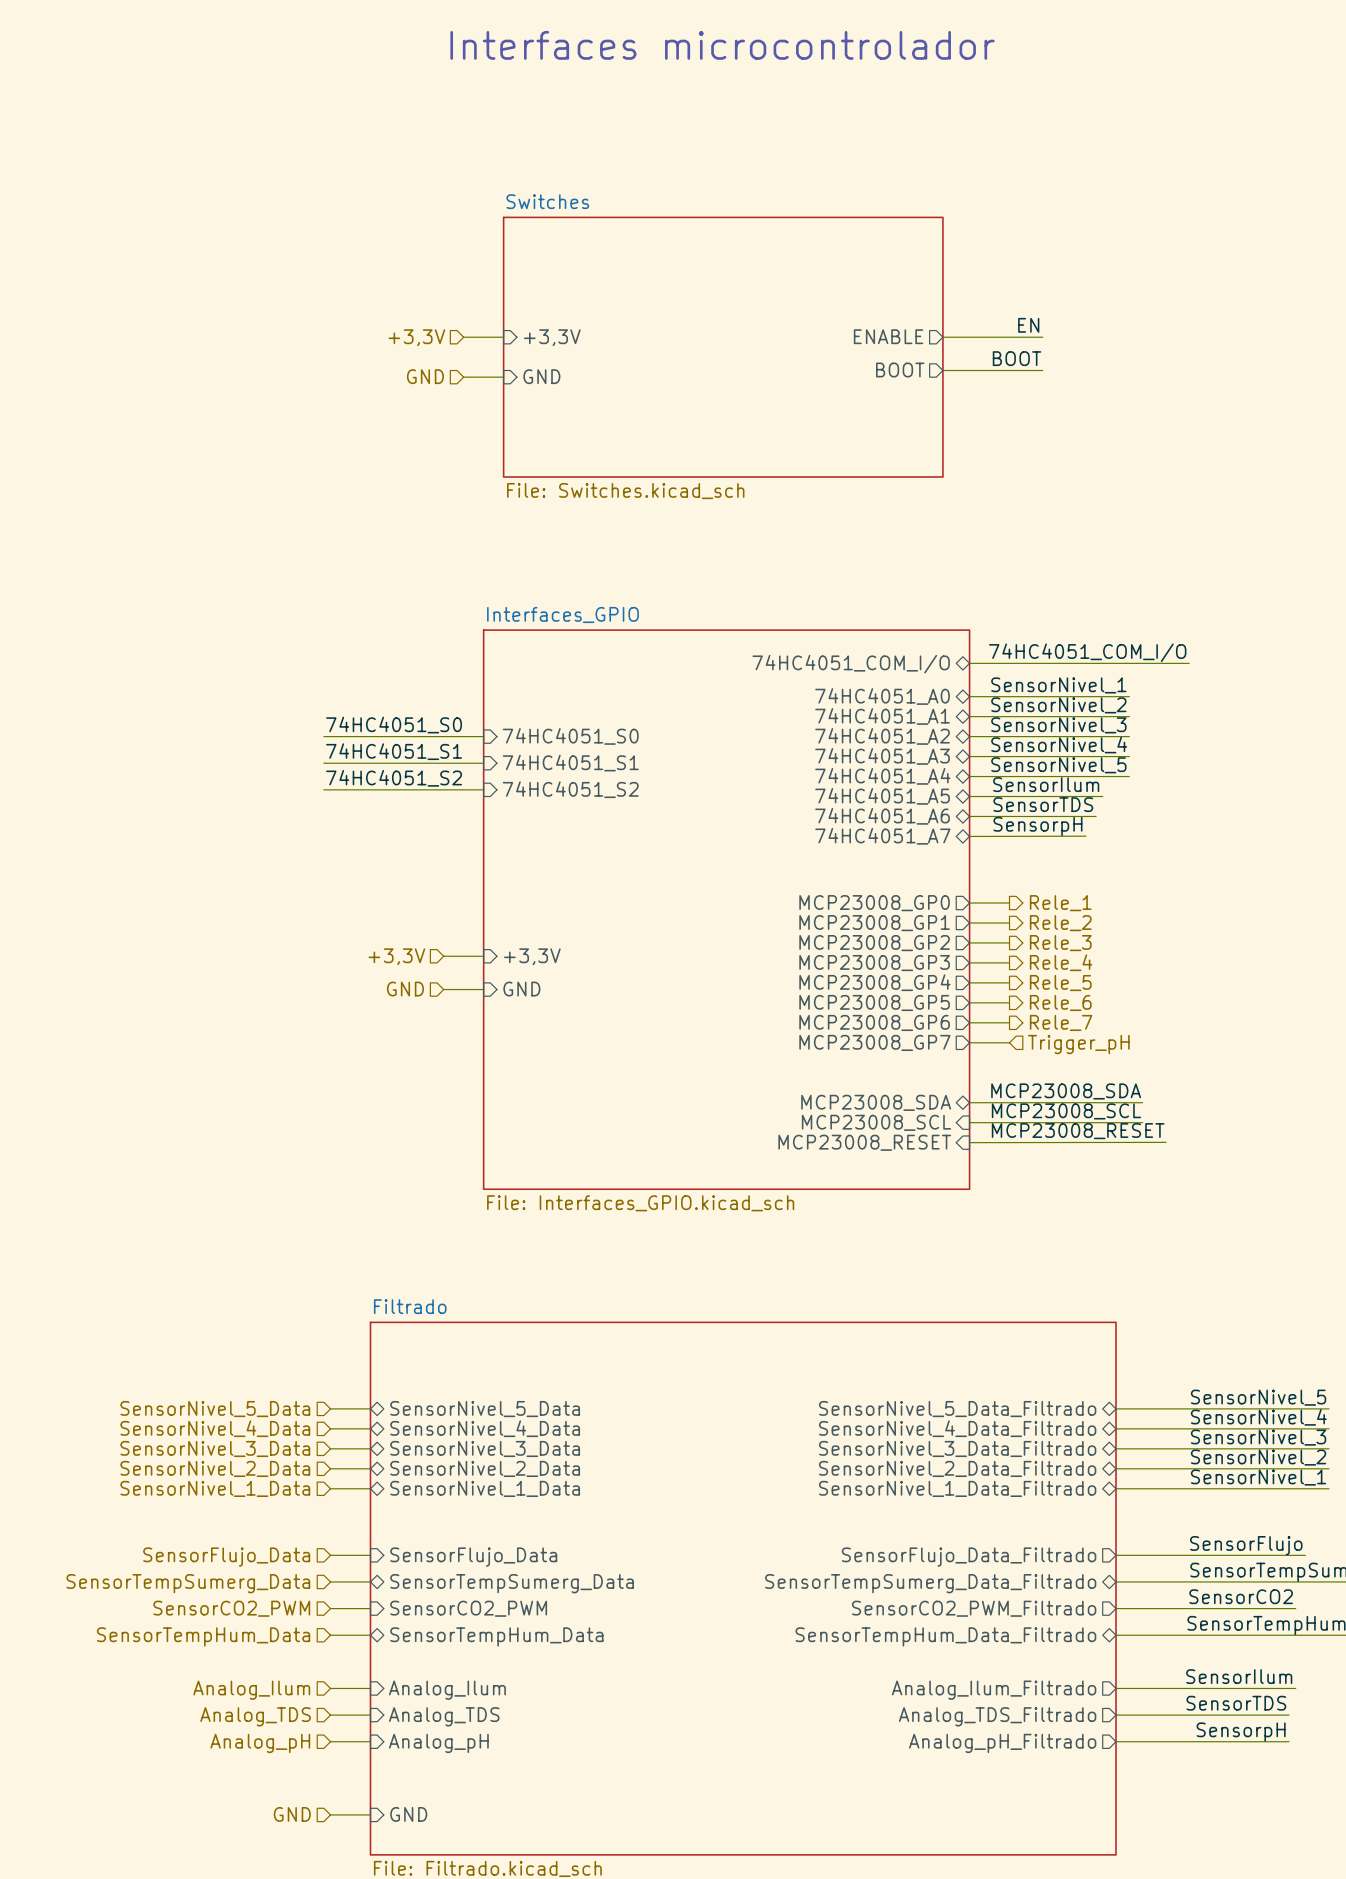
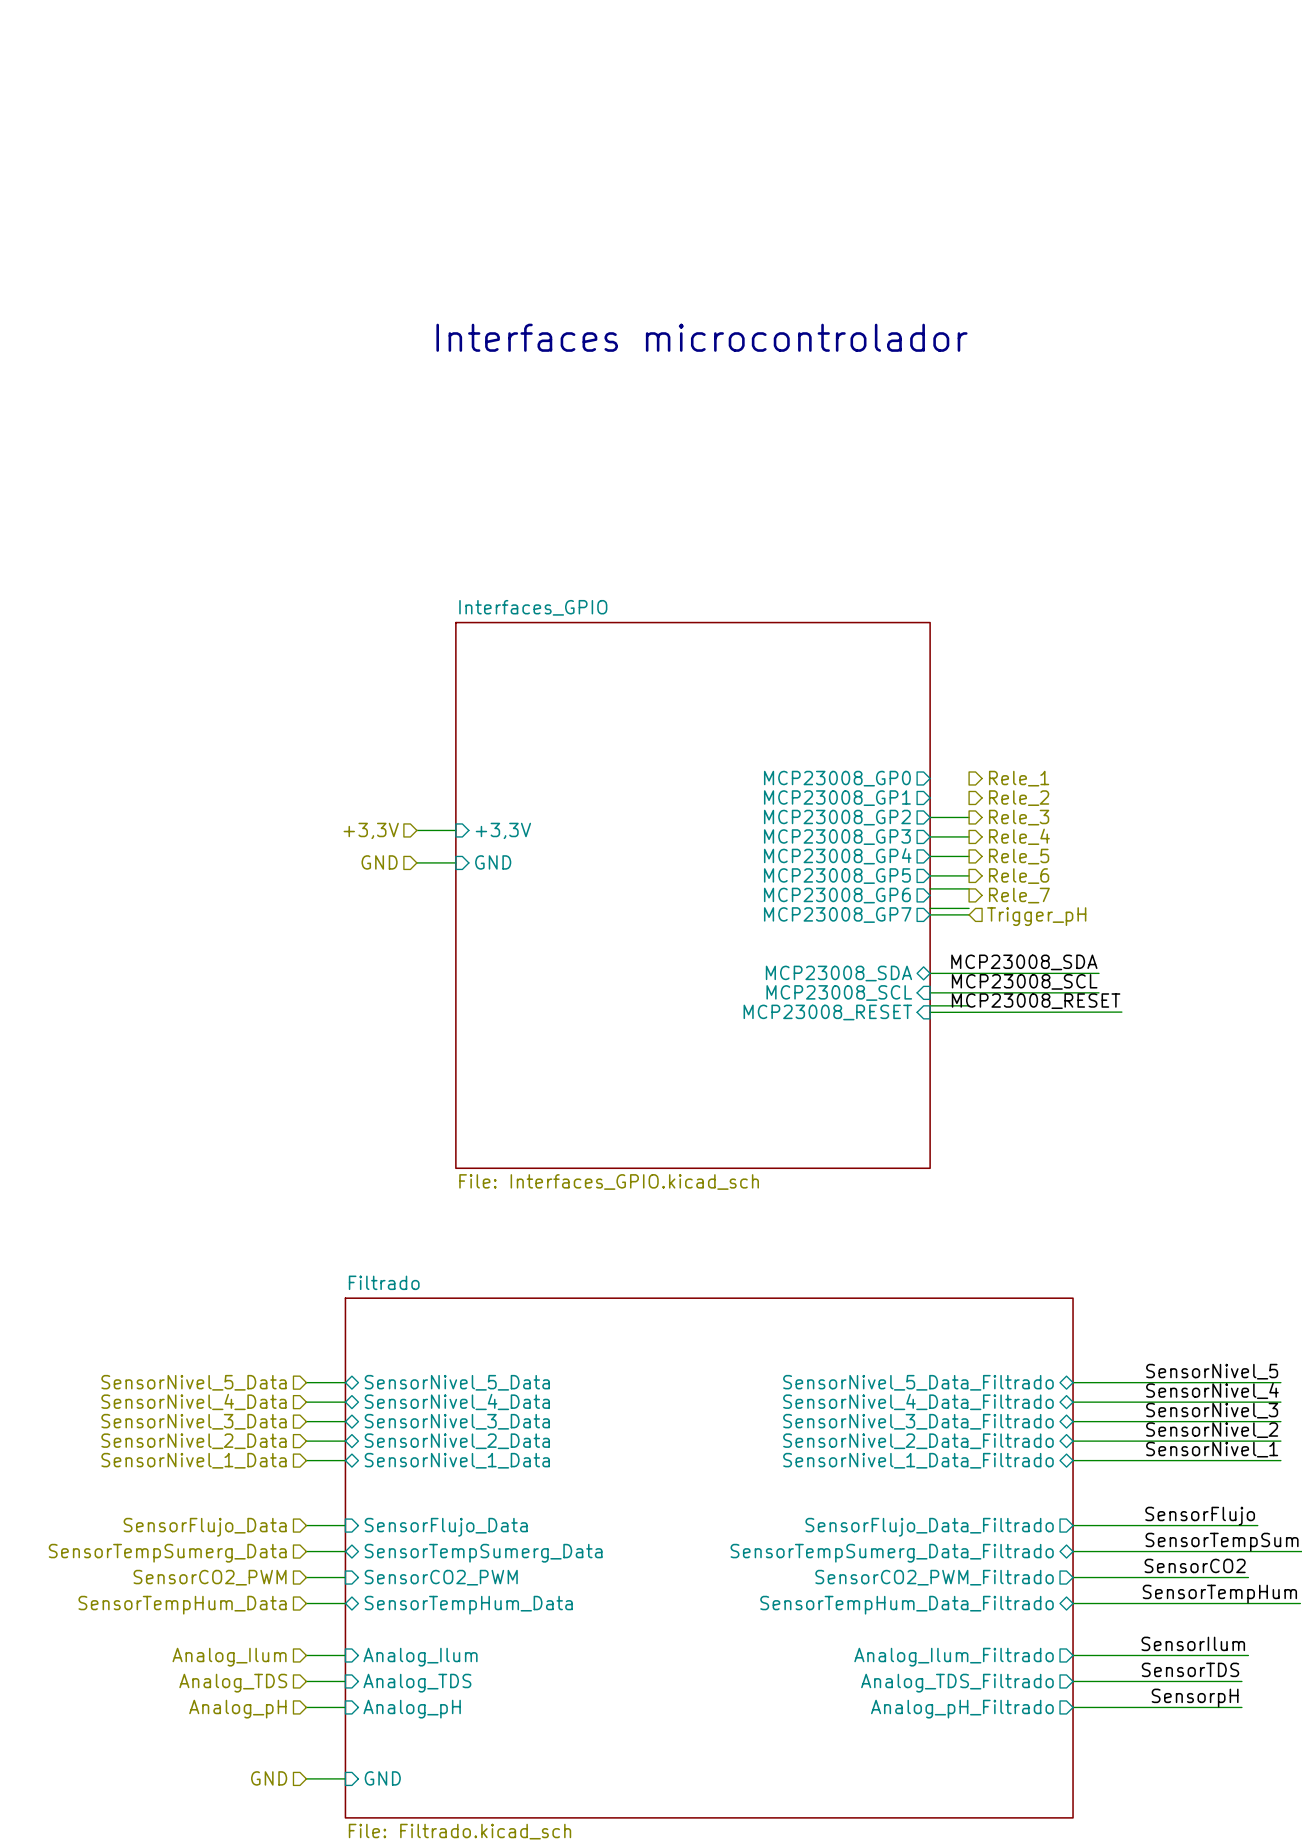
text: Interfaces microcontrolador (722, 45) -> none
label: EN (1028, 325) -> none
sheet pin: ENABLE (888, 336) -> none
hierarchical label: +3,3V (416, 337) -> none
wire: (463, 337) (503, 337) -> none
sheet pin: +3,3V (552, 337) -> none
wire: (942, 337) (1042, 337) -> none
text: none -> Interfaces microcontrolador (701, 337)
sheet Switches: File: Switches.kicad_sch (723, 347) -> none
label: BOOT (1017, 358) -> none
sheet pin: BOOT (900, 370) -> none
wire: (942, 370) (1042, 370) -> none
hierarchical label: GND (425, 376) -> none
sheet pin: GND (541, 376) -> none
wire: (463, 377) (503, 377) -> none
label: 74HC4051_COM_I/O (1087, 652) -> none
wire: (969, 663) (1189, 663) -> none
sheet pin: 74HC4051_COM_I/O (851, 664) -> none
label: SensorNivel_1 (1058, 685) -> none
sheet pin: 74HC4051_A0 (882, 696) -> none
wire: (969, 696) (1129, 696) -> none
label: SensorNivel_2 (1058, 705) -> none
sheet pin: 74HC4051_A1 (882, 716) -> none
wire: (969, 716) (1129, 716) -> none
label: 74HC4051_S0 (394, 725) -> none
label: SensorNivel_3 (1058, 725) -> none
wire: (323, 736) (483, 736) -> none
sheet pin: 74HC4051_S0 (570, 736) -> none
sheet pin: 74HC4051_A2 (882, 736) -> none
wire: (969, 736) (1129, 736) -> none
label: SensorNivel_4 (1059, 745) -> none
label: 74HC4051_S1 (394, 751) -> none
sheet pin: 74HC4051_A3 (882, 756) -> none
wire: (969, 756) (1129, 756) -> none
wire: (323, 763) (483, 763) -> none
sheet pin: 74HC4051_S1 (570, 763) -> none
label: SensorNivel_5 (1058, 765) -> none
sheet pin: 74HC4051_A4 (882, 776) -> none
wire: (969, 776) (1129, 776) -> none
label: 74HC4051_S2 (394, 778) -> none
label: SensorIlum (1046, 784) -> none
wire: (323, 789) (483, 789) -> none
sheet pin: 74HC4051_S2 (570, 789) -> none
sheet pin: 74HC4051_A5 (882, 796) -> none
wire: (969, 796) (1102, 796) -> none
label: SensorTDS (1043, 804) -> none
sheet pin: 74HC4051_A6 (882, 816) -> none
wire: (969, 816) (1096, 816) -> none
label: SensorpH (1037, 826) -> none
sheet pin: 74HC4051_A7 (882, 836) -> none
wire: (1085, 836) (969, 836) -> none
sheet pin position: MCP23008_GP0 (874, 903) -> MCP23008_GP0 (837, 778)
hierarchical label position: Rele_1 (1060, 903) -> Rele_1 (1019, 778)
sheet pin position: MCP23008_GP1 (874, 923) -> MCP23008_GP1 (837, 798)
hierarchical label position: Rele_2 (1060, 923) -> Rele_2 (1019, 798)
wire: (969, 942) (1009, 942) -> (930, 817) (969, 817)
sheet pin position: MCP23008_GP2 (874, 943) -> MCP23008_GP2 (837, 817)
hierarchical label position: Rele_3 (1060, 943) -> Rele_3 (1019, 817)
hierarchical label position: +3,3V (396, 956) -> +3,3V (371, 830)
wire: (443, 956) (483, 956) -> (416, 830) (455, 830)
sheet pin position: +3,3V (532, 956) -> +3,3V (503, 830)
wire: (969, 962) (1009, 962) -> (930, 836) (969, 836)
hierarchical label position: Rele_4 (1061, 962) -> Rele_4 (1019, 836)
sheet pin position: MCP23008_GP3 (874, 963) -> MCP23008_GP3 (837, 837)
sheet pin position: MCP23008_GP4 (874, 982) -> MCP23008_GP4 (837, 856)
wire: (969, 982) (1009, 982) -> (930, 856) (969, 856)
hierarchical label position: Rele_5 (1060, 983) -> Rele_5 (1019, 856)
hierarchical label position: GND (405, 989) -> GND (379, 862)
wire: (443, 989) (483, 989) -> (416, 862) (455, 862)
sheet pin position: GND (521, 989) -> GND (493, 862)
sheet pin position: MCP23008_GP5 (874, 1002) -> MCP23008_GP5 (837, 876)
wire: (969, 1002) (1009, 1002) -> (930, 875) (969, 875)
hierarchical label position: Rele_6 (1060, 1002) -> Rele_6 (1019, 876)
sheet pin position: MCP23008_GP6 (874, 1022) -> MCP23008_GP6 (837, 895)
hierarchical label position: Rele_7 (1061, 1022) -> Rele_7 (1019, 895)
sheet pin position: MCP23008_GP7 (874, 1042) -> MCP23008_GP7 (837, 915)
wire: (969, 1042) (1009, 1042) -> (930, 914) (969, 914)
hierarchical label position: Trigger_pH (1078, 1044) -> Trigger_pH (1036, 916)
label position: MCP23008_SDA (1066, 1091) -> MCP23008_SDA (1024, 962)
sheet pin position: MCP23008_SDA (876, 1102) -> MCP23008_SDA (838, 973)
wire: (969, 1102) (1142, 1102) -> (930, 973) (1099, 973)
label position: MCP23008_SCL (1066, 1111) -> MCP23008_SCL (1024, 981)
sheet pin position: MCP23008_SCL (876, 1122) -> MCP23008_SCL (839, 993)
wire: (969, 1122) (1142, 1122) -> (930, 992) (1099, 992)
label position: MCP23008_RESET (1078, 1131) -> MCP23008_RESET (1036, 1001)
sheet pin position: MCP23008_RESET (864, 1142) -> MCP23008_RESET (827, 1012)
wire: (1166, 1142) (969, 1142) -> (1121, 1012) (930, 1012)

